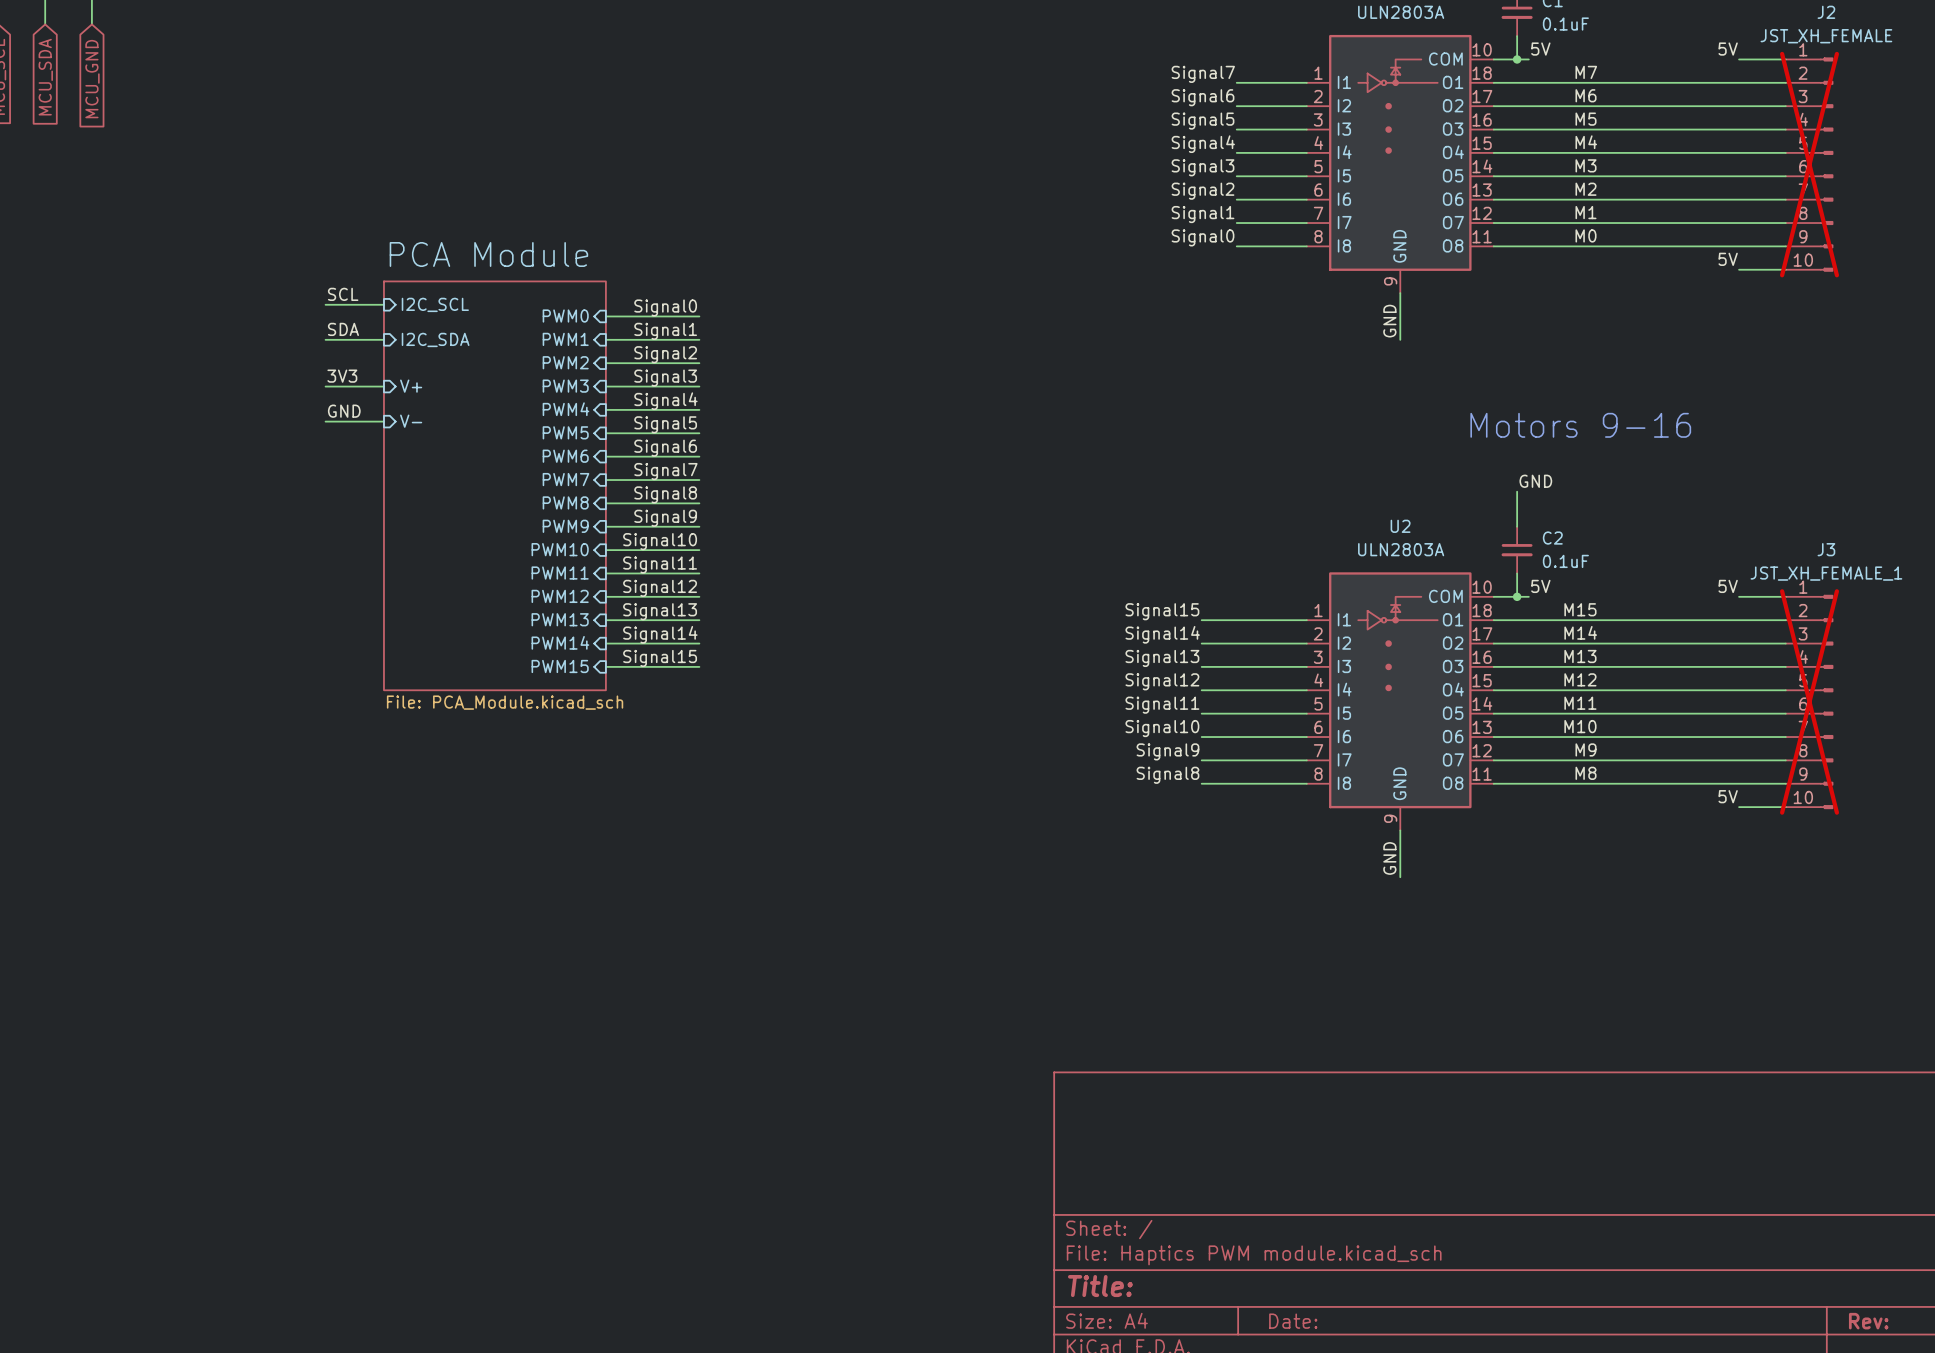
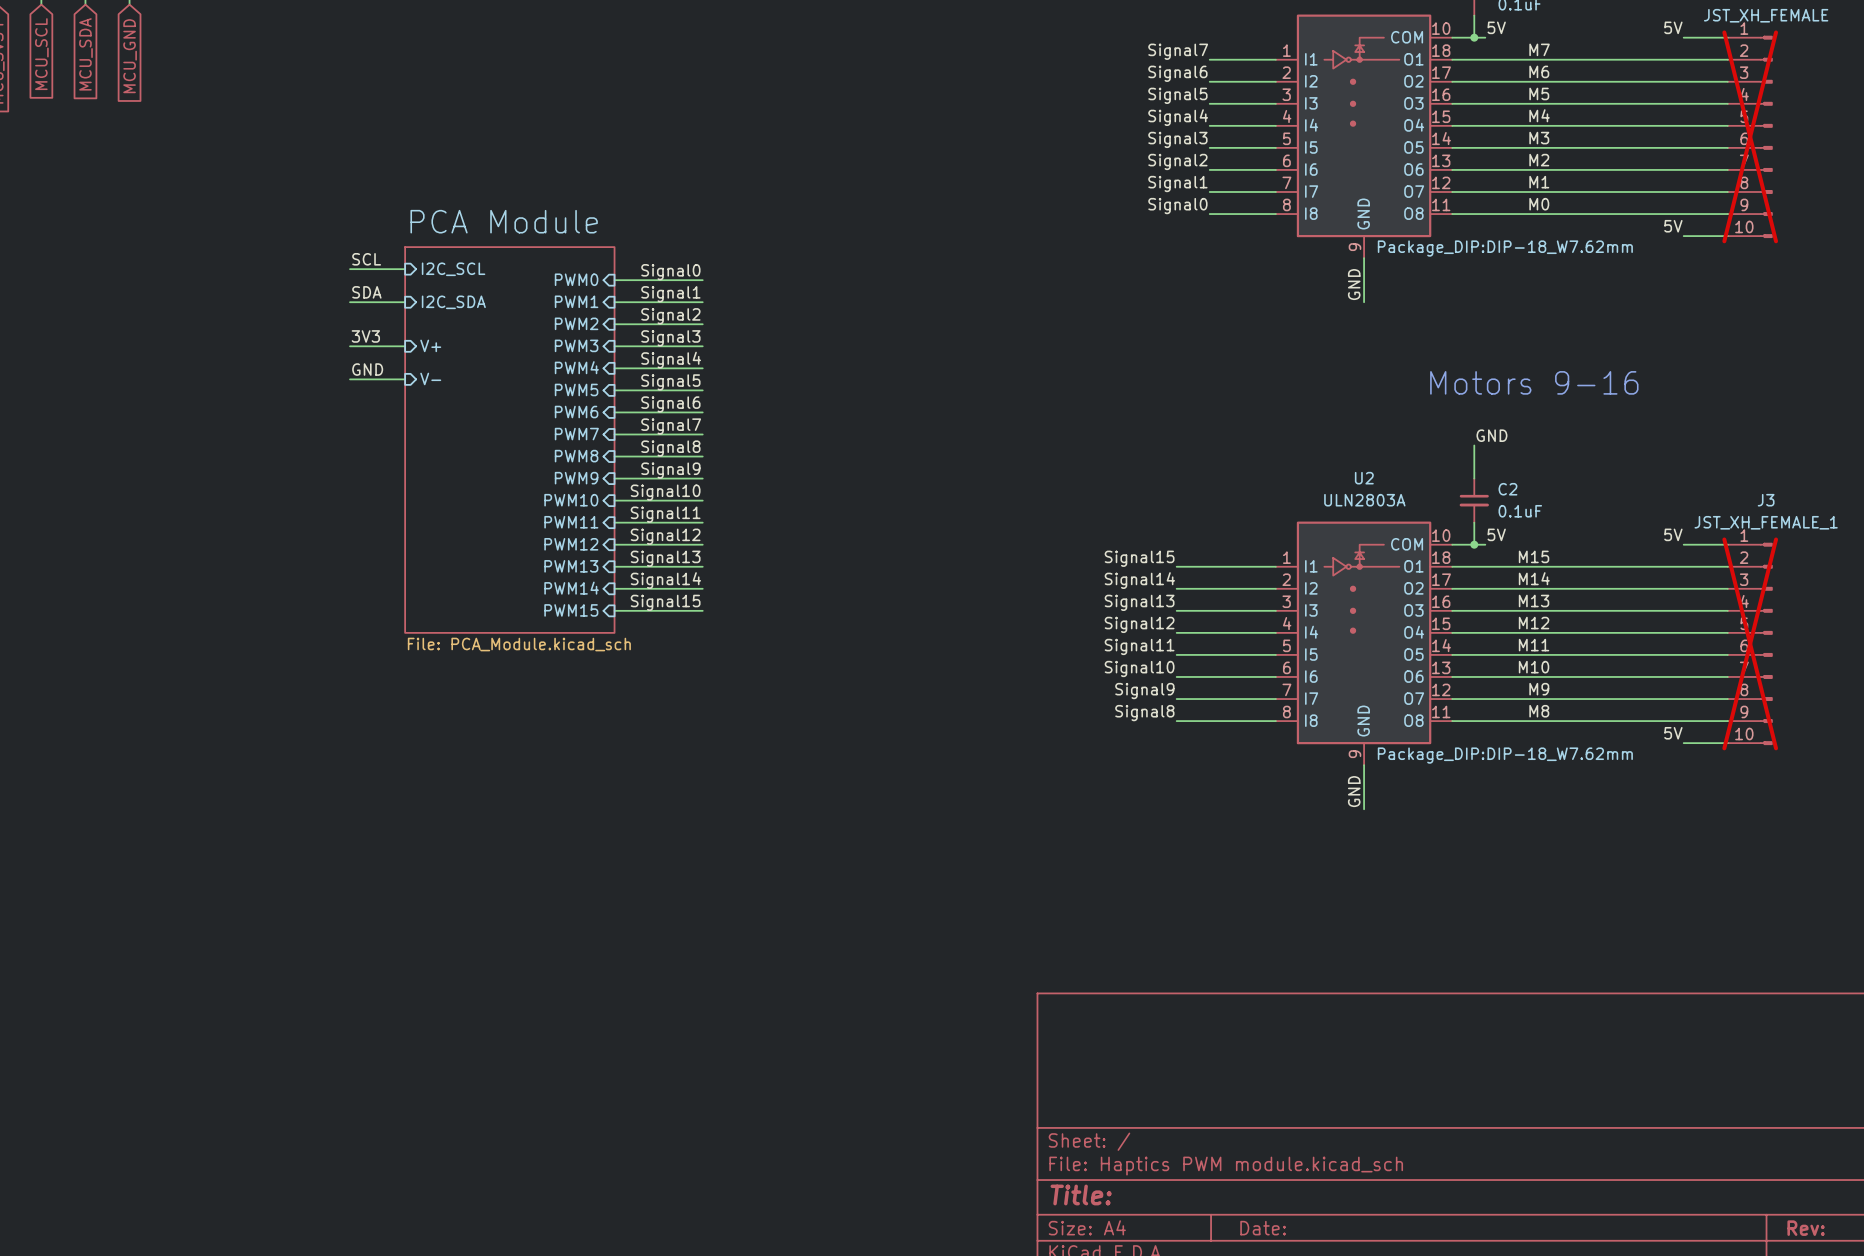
part text: none -> Package_DIP:DIP-18_W7.62mm (1505, 248)
U2 text: none -> Package_DIP:DIP-18_W7.62mm (1505, 755)

